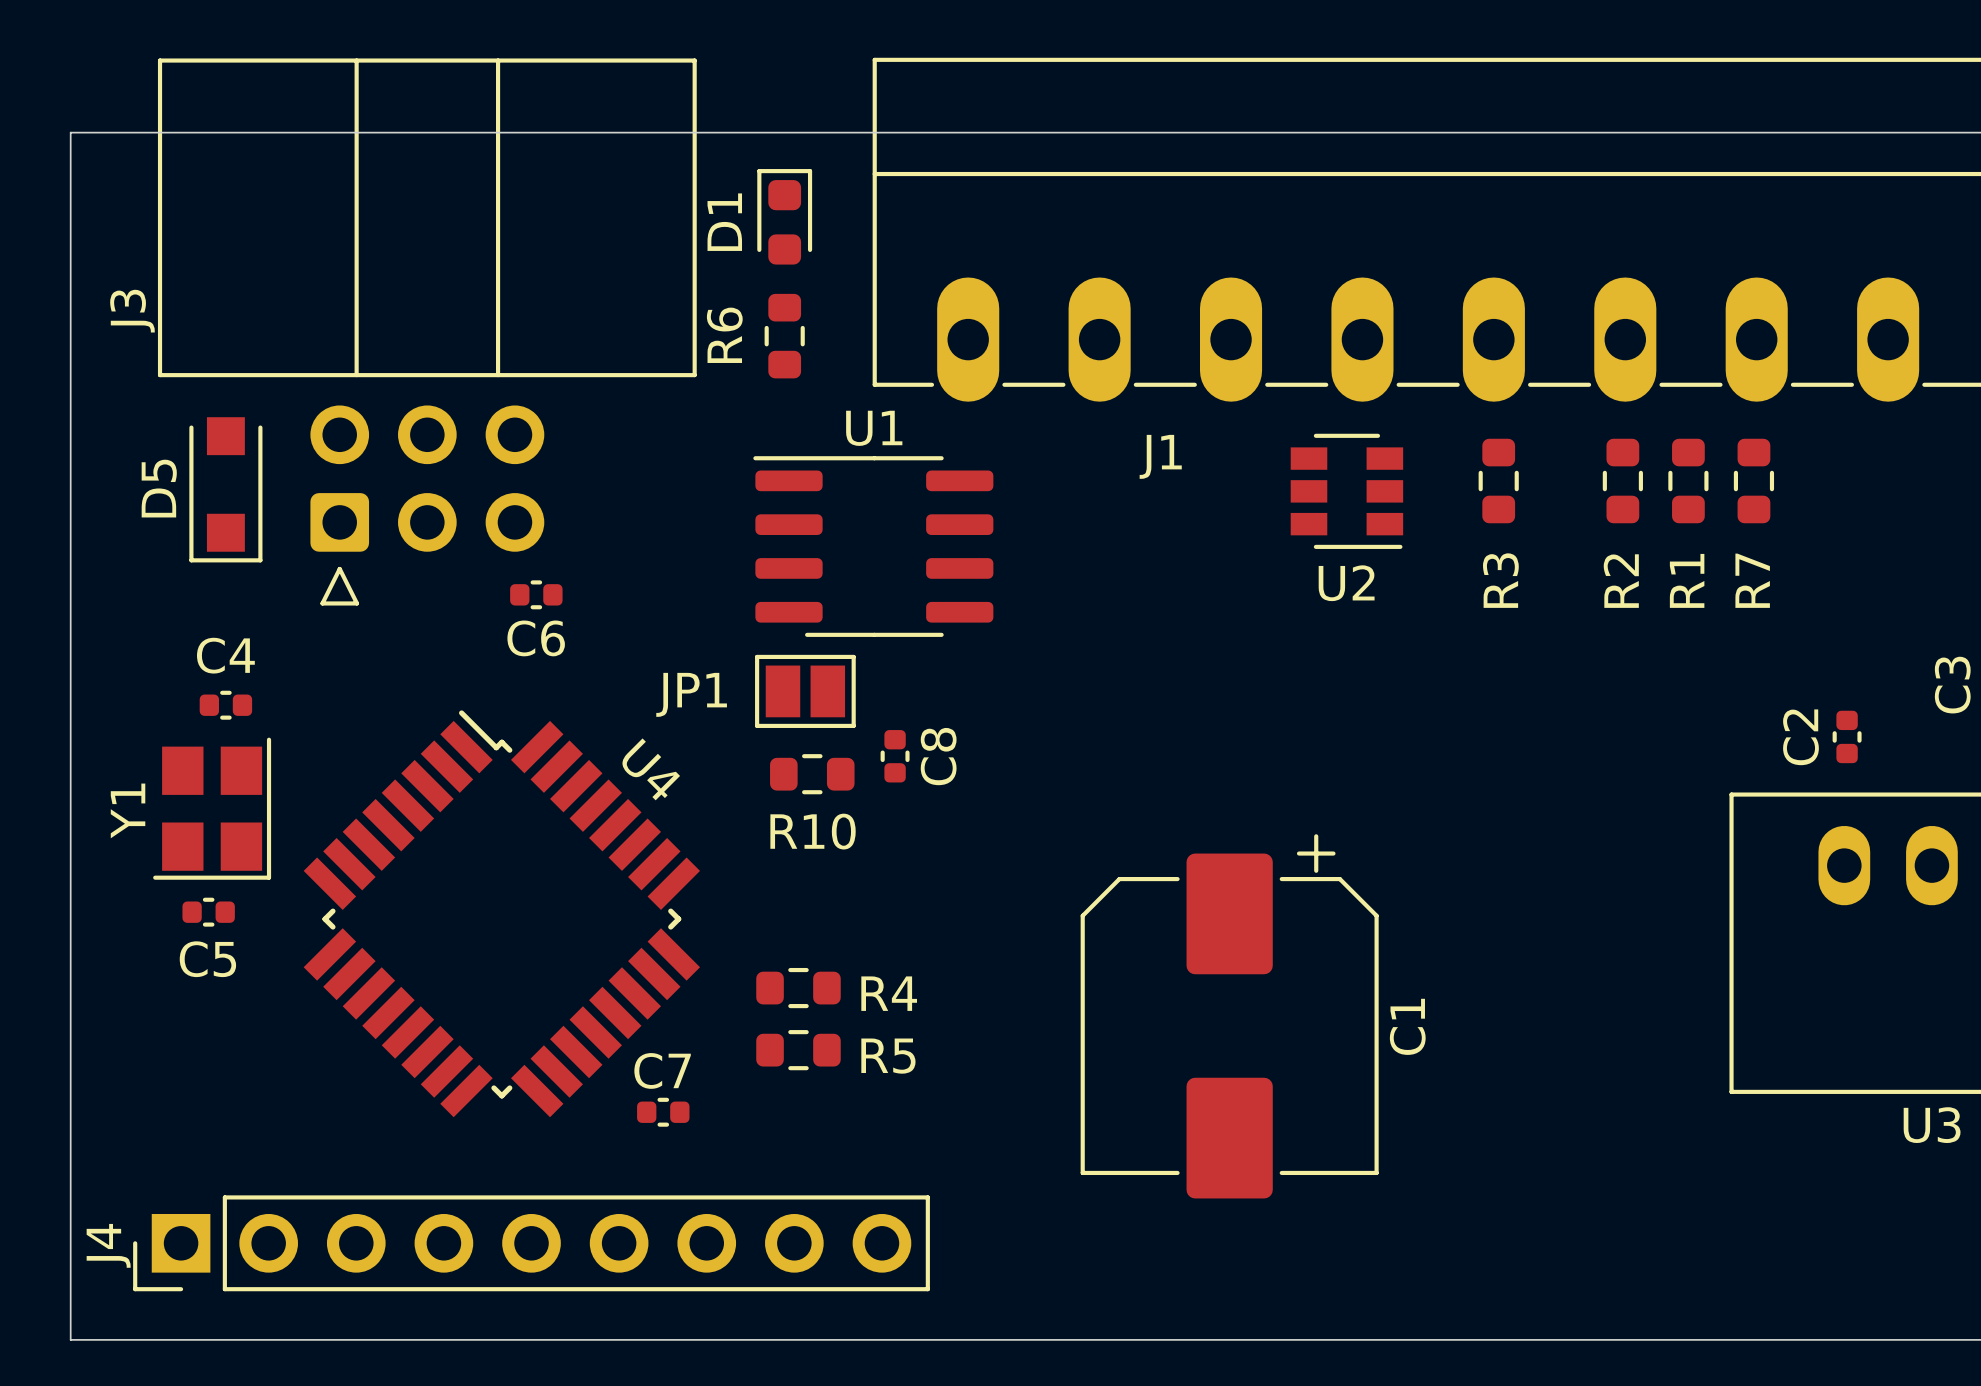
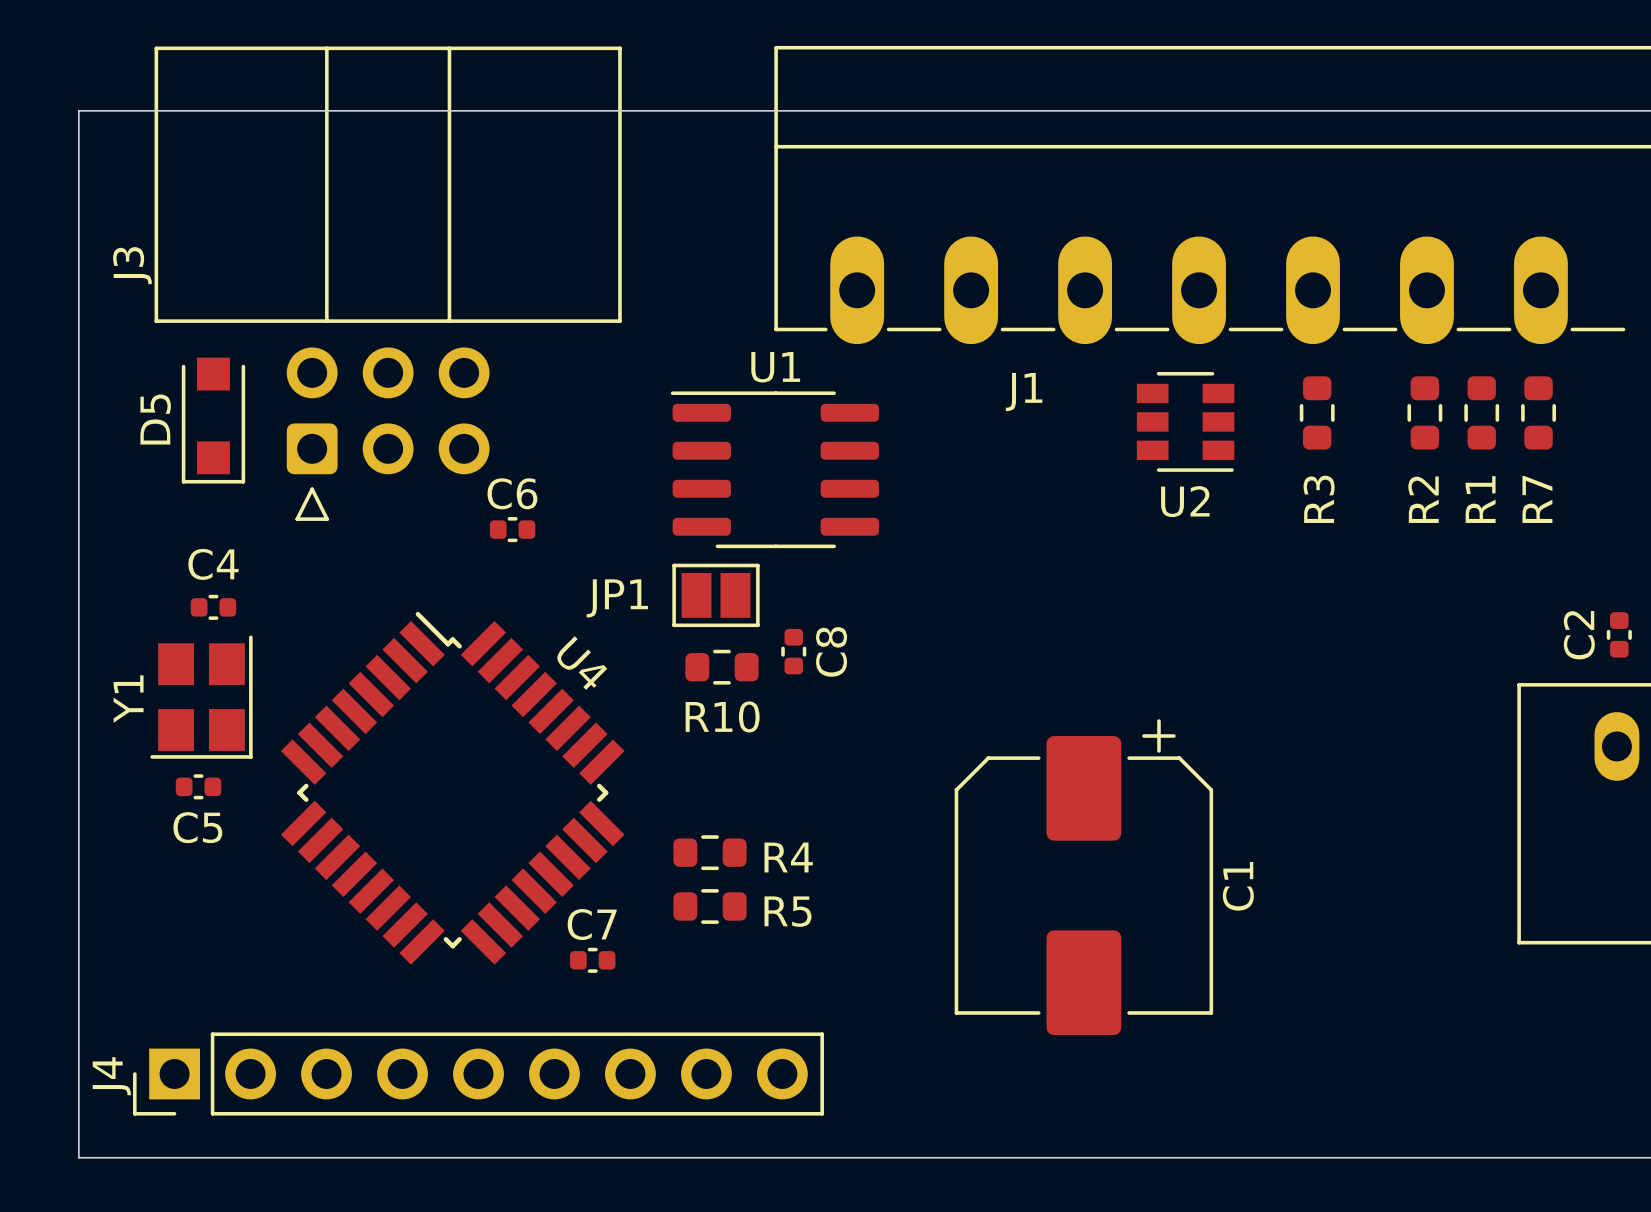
D1: (784, 216) -> none
R6: (784, 336) -> none
C6 position: (536, 594) -> (512, 529)
C6 name position: C6 (536, 638) -> C6 (512, 493)

